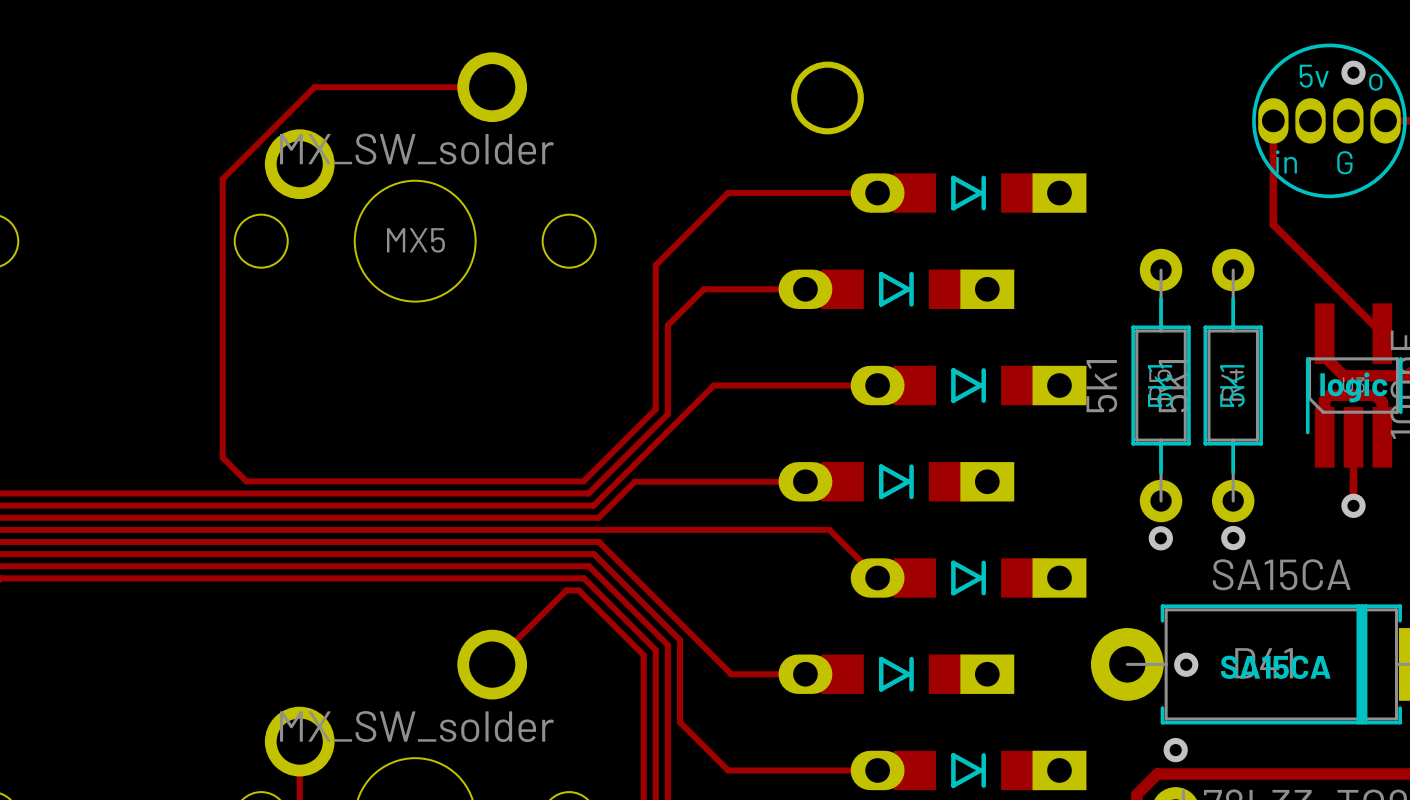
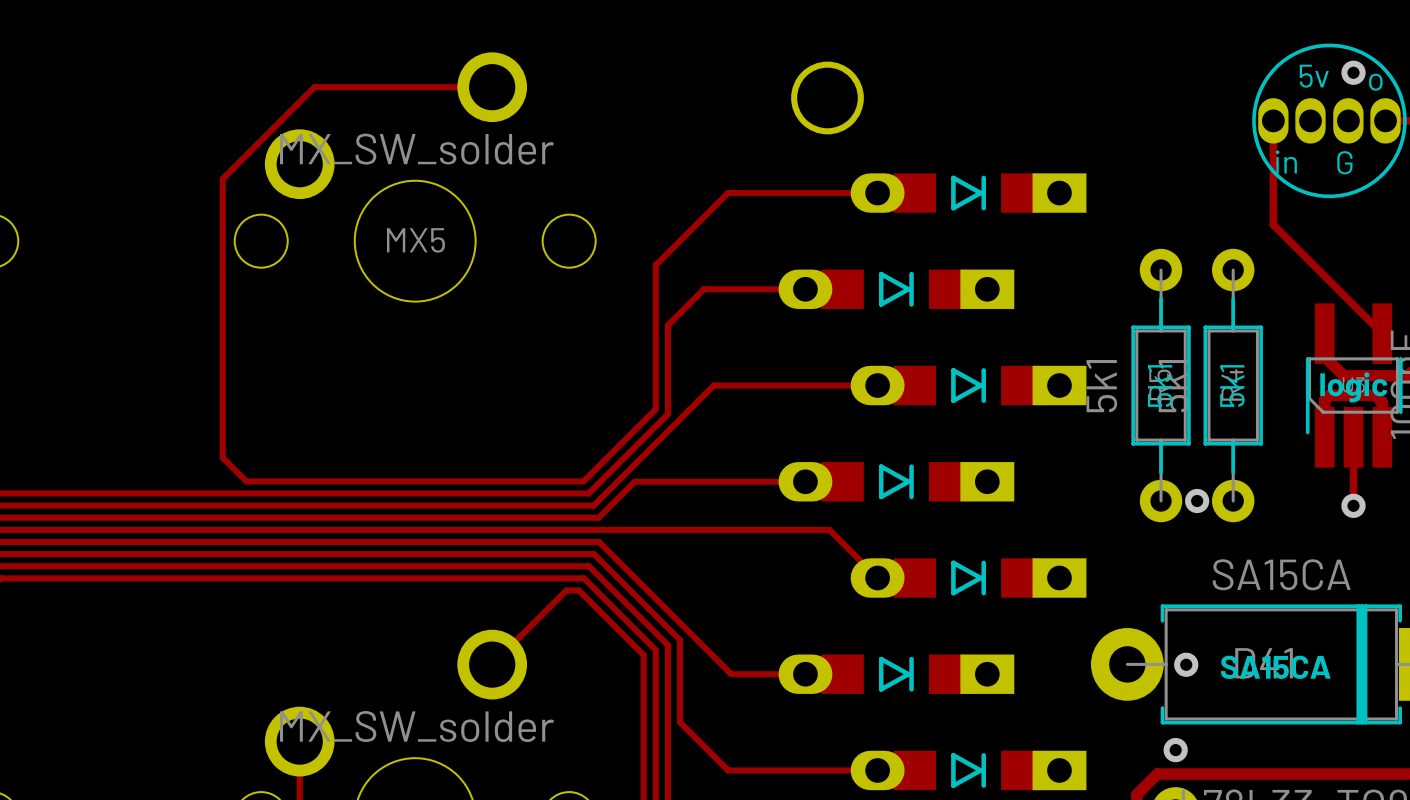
via: none -> (1197, 501)
via: (1160, 538) -> none
via: (1233, 538) -> none

